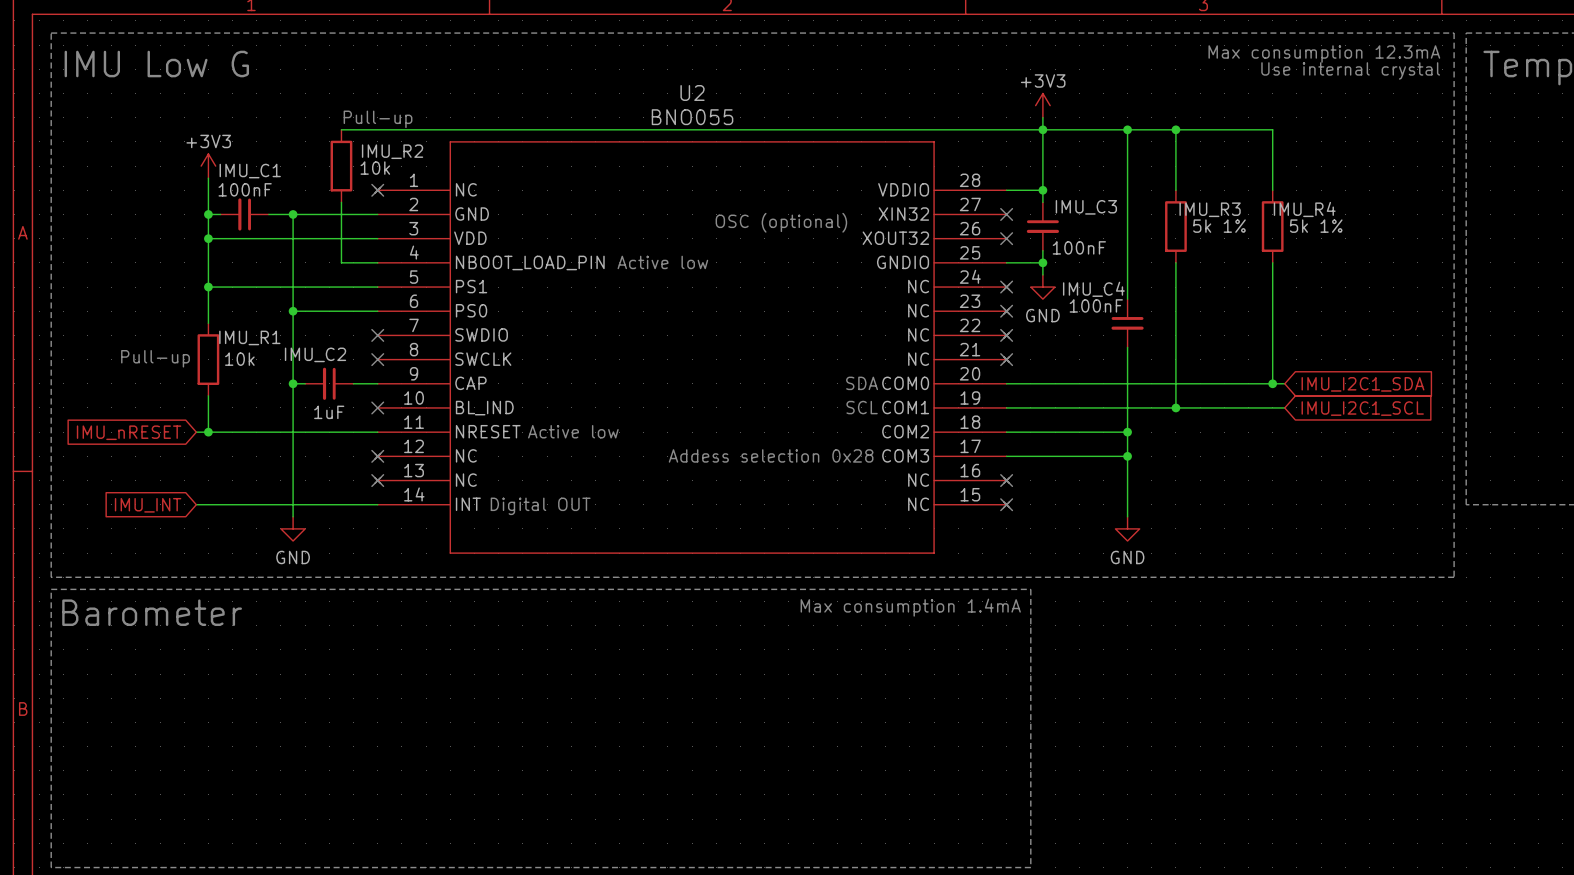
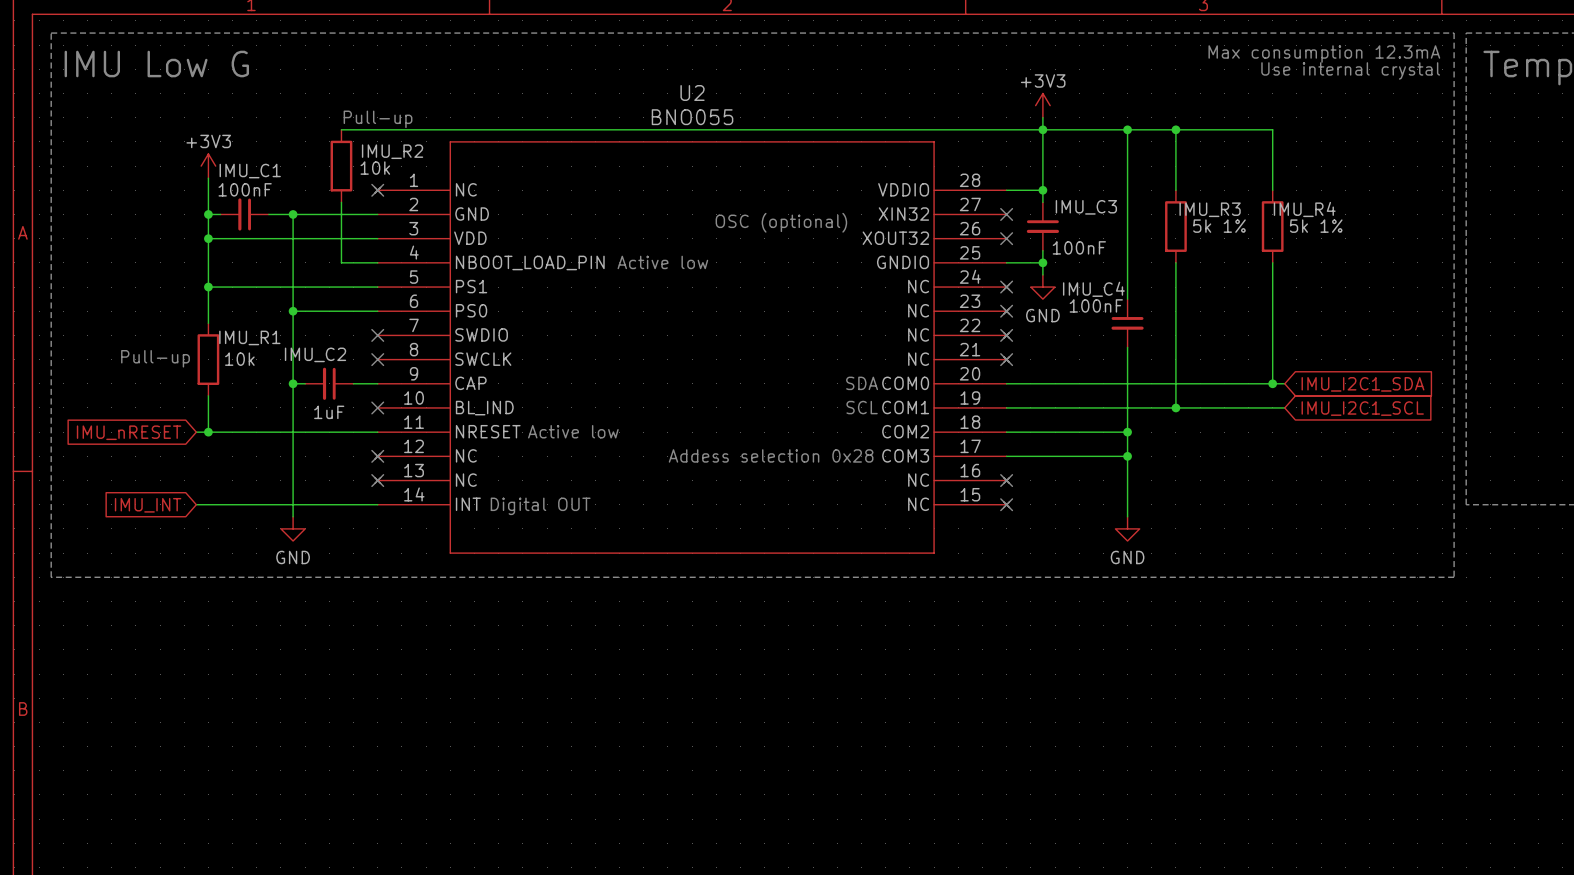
line: (51, 589) (1030, 589) (1030, 867) (51, 867) (51, 589) -> none
text: Max consumption 1.4mA (910, 607) -> none
text: Barometer (152, 612) -> none

